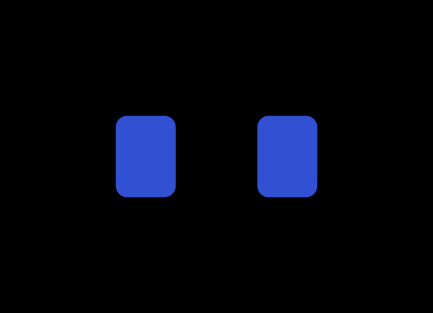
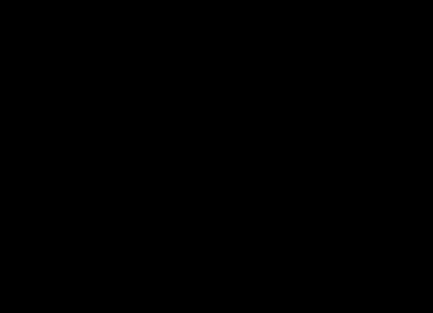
part: (216, 156) -> none

